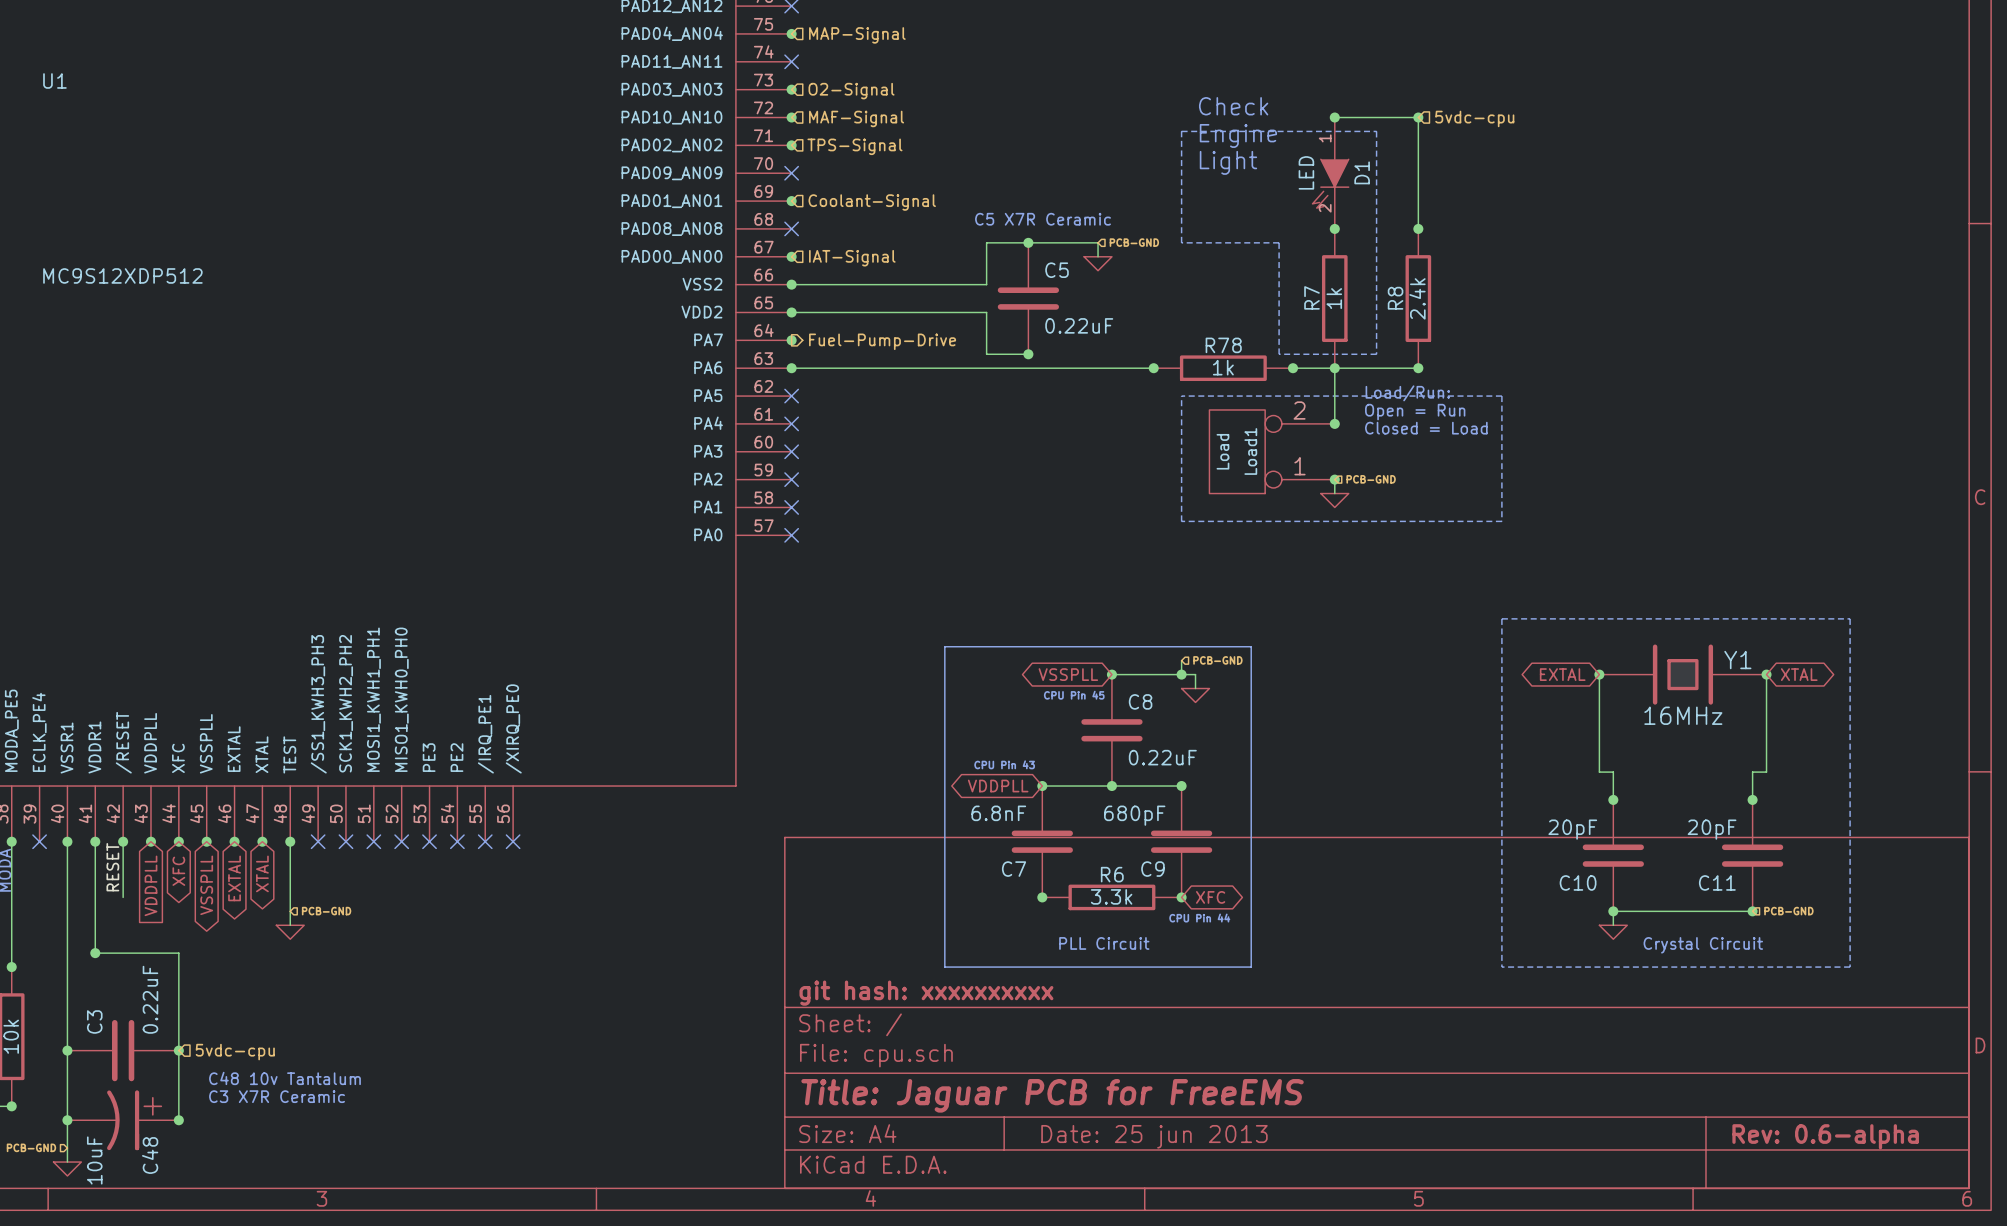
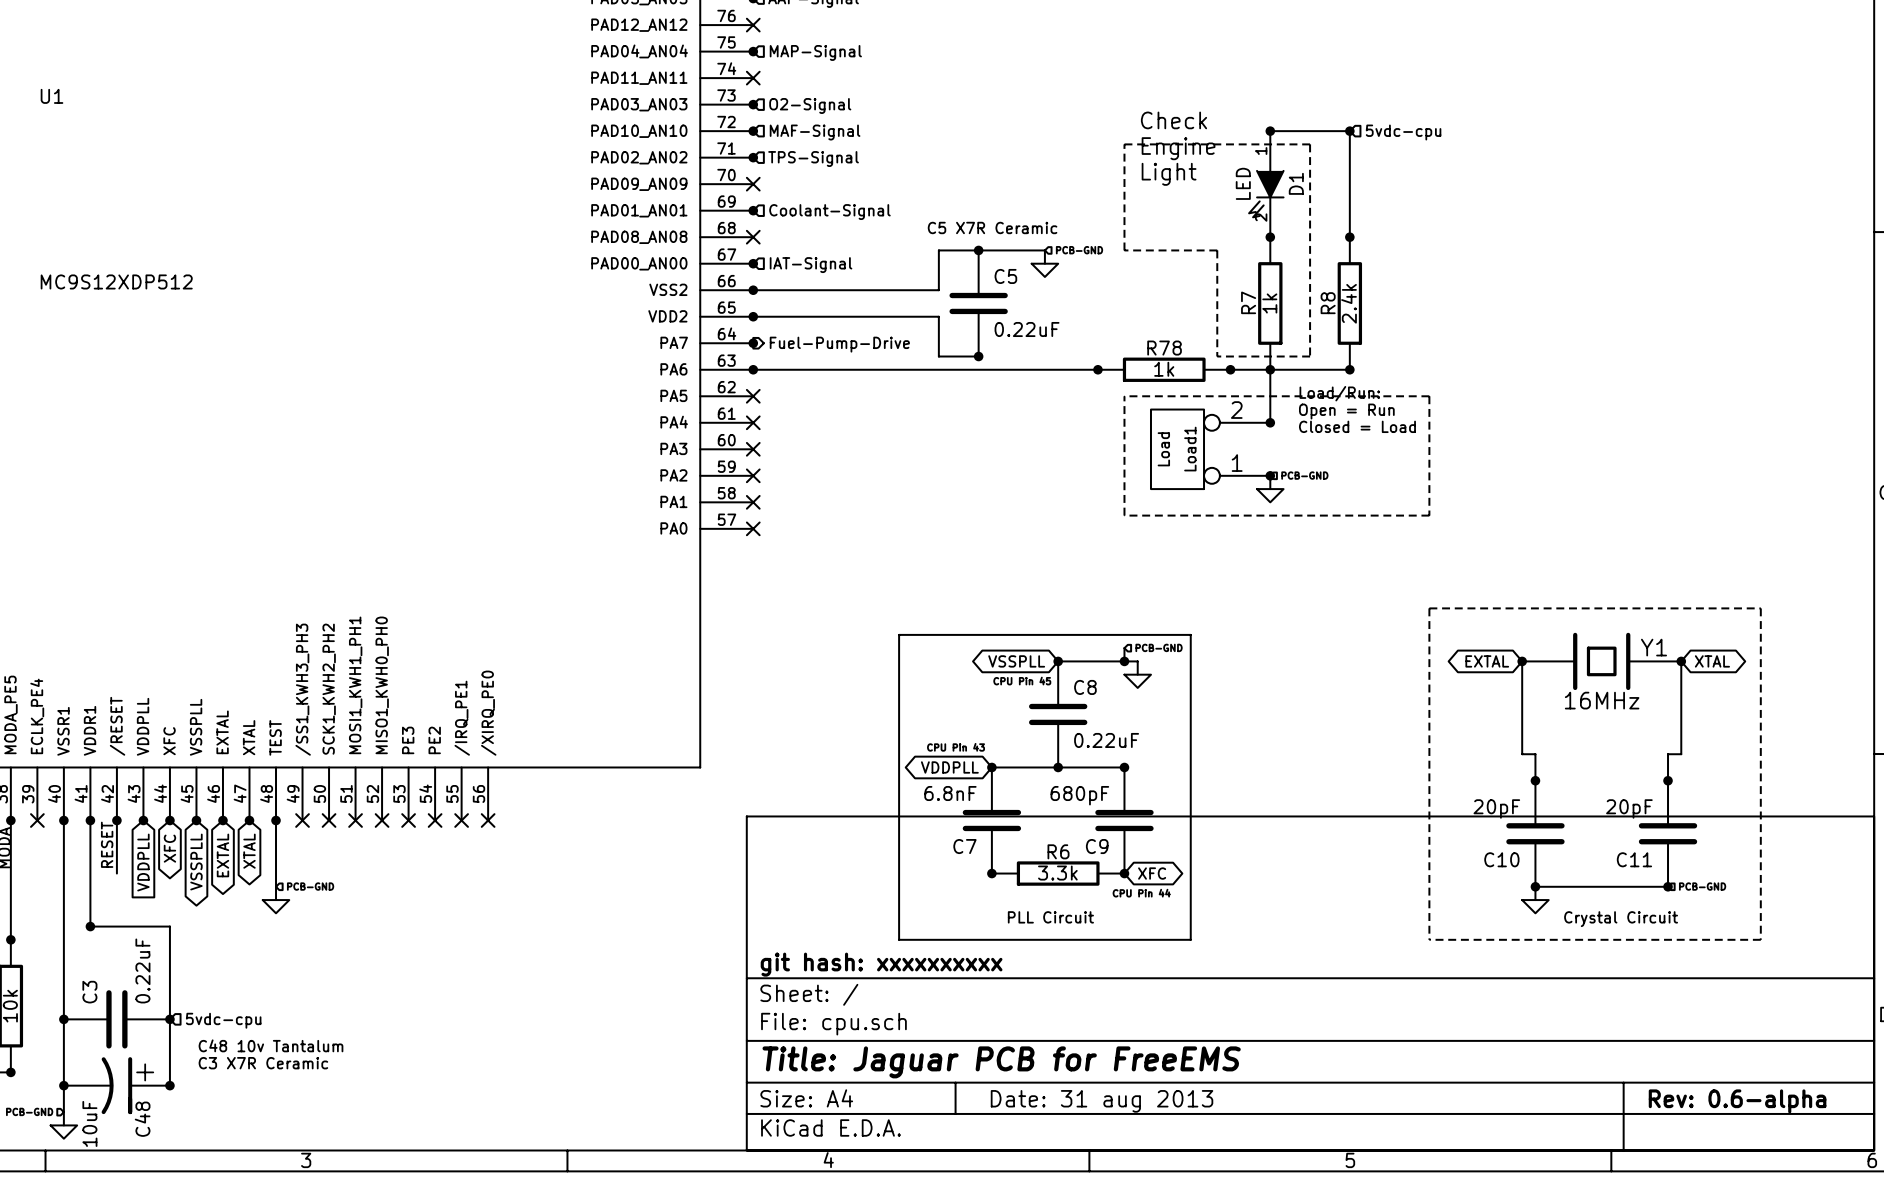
title block: Date: 25 jun 2013 (1154, 1136) -> Date: 31 aug 2013 (1102, 1101)

